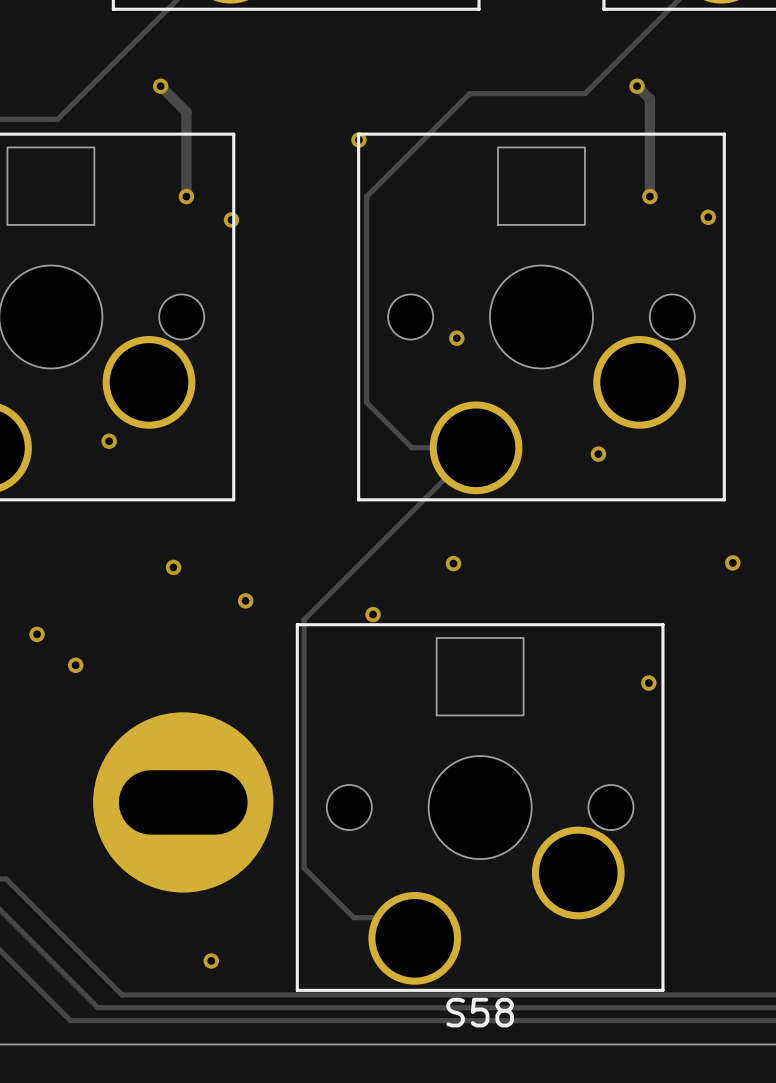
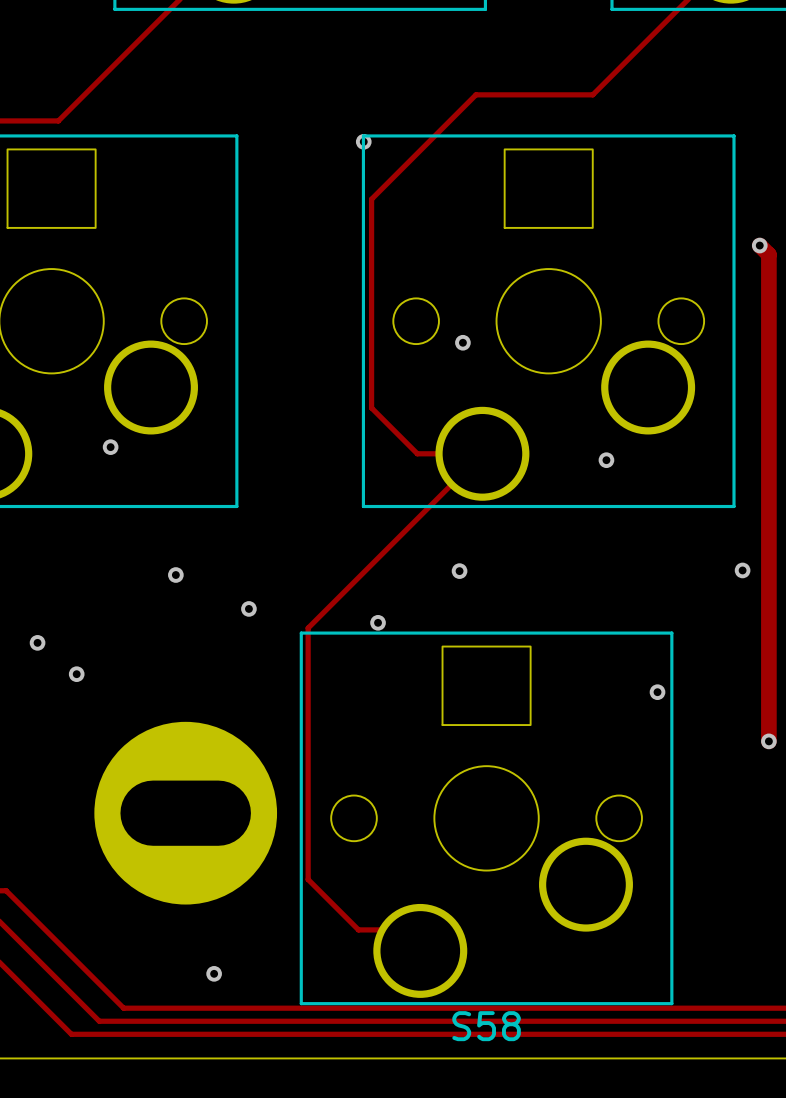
track: (160, 86) (186, 112) (186, 196) -> none
via: (160, 86) -> none
track: (637, 86) (649, 99) (649, 196) -> none
via: (637, 86) -> none
via: (186, 196) -> none
via: (649, 196) -> none
via position: (708, 217) -> (759, 245)
via: (231, 219) -> none
track: none -> (759, 245) (768, 254) (768, 741)
via: none -> (768, 741)

